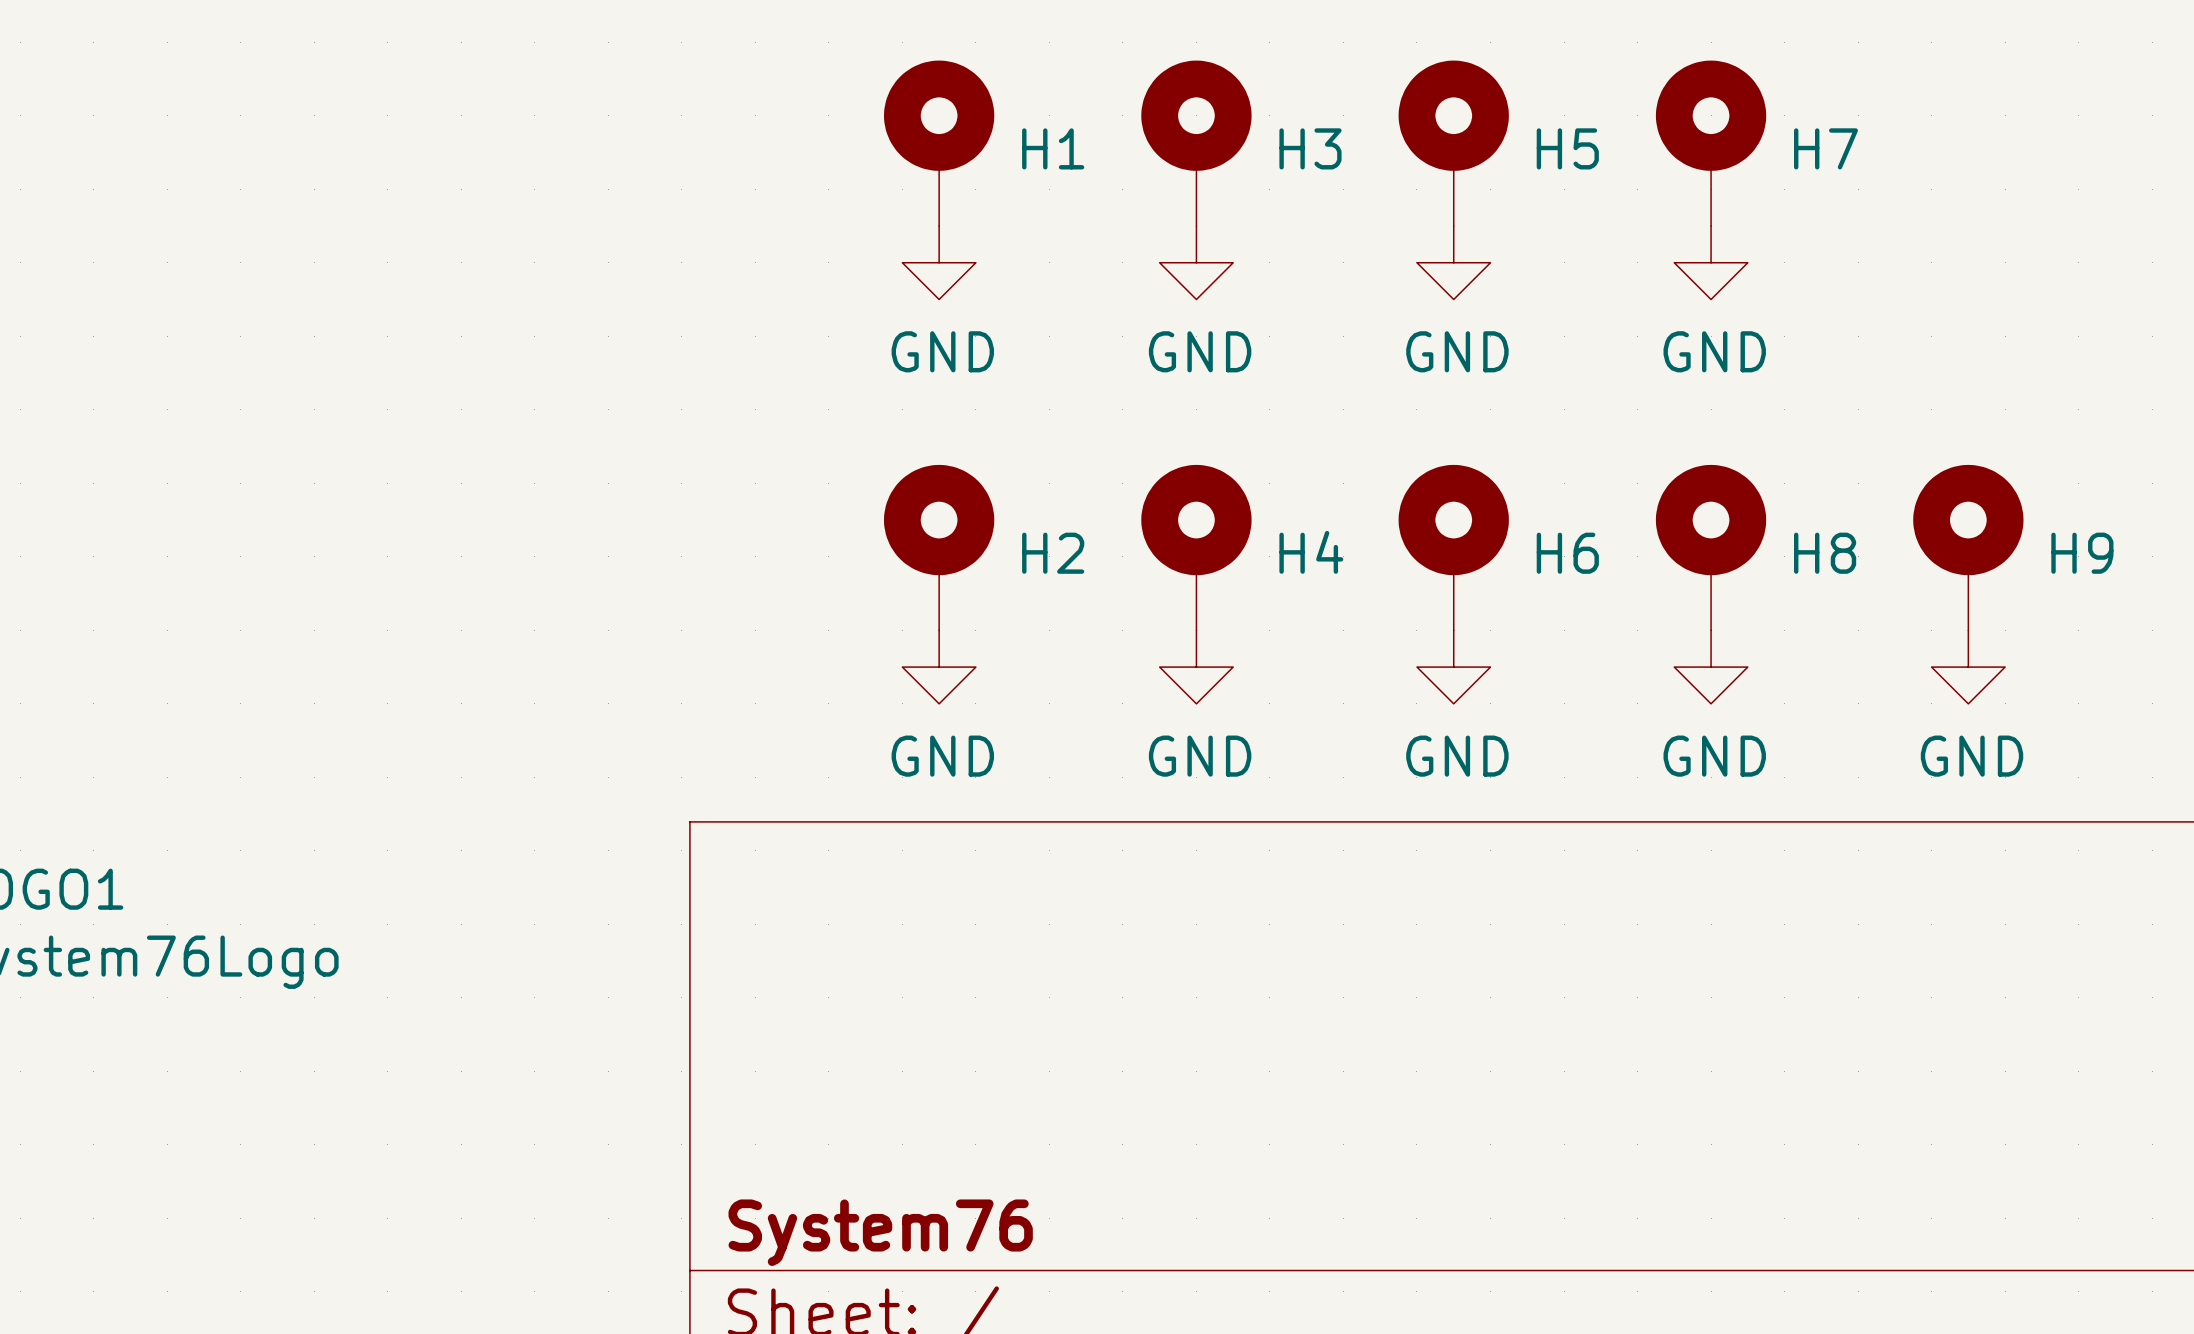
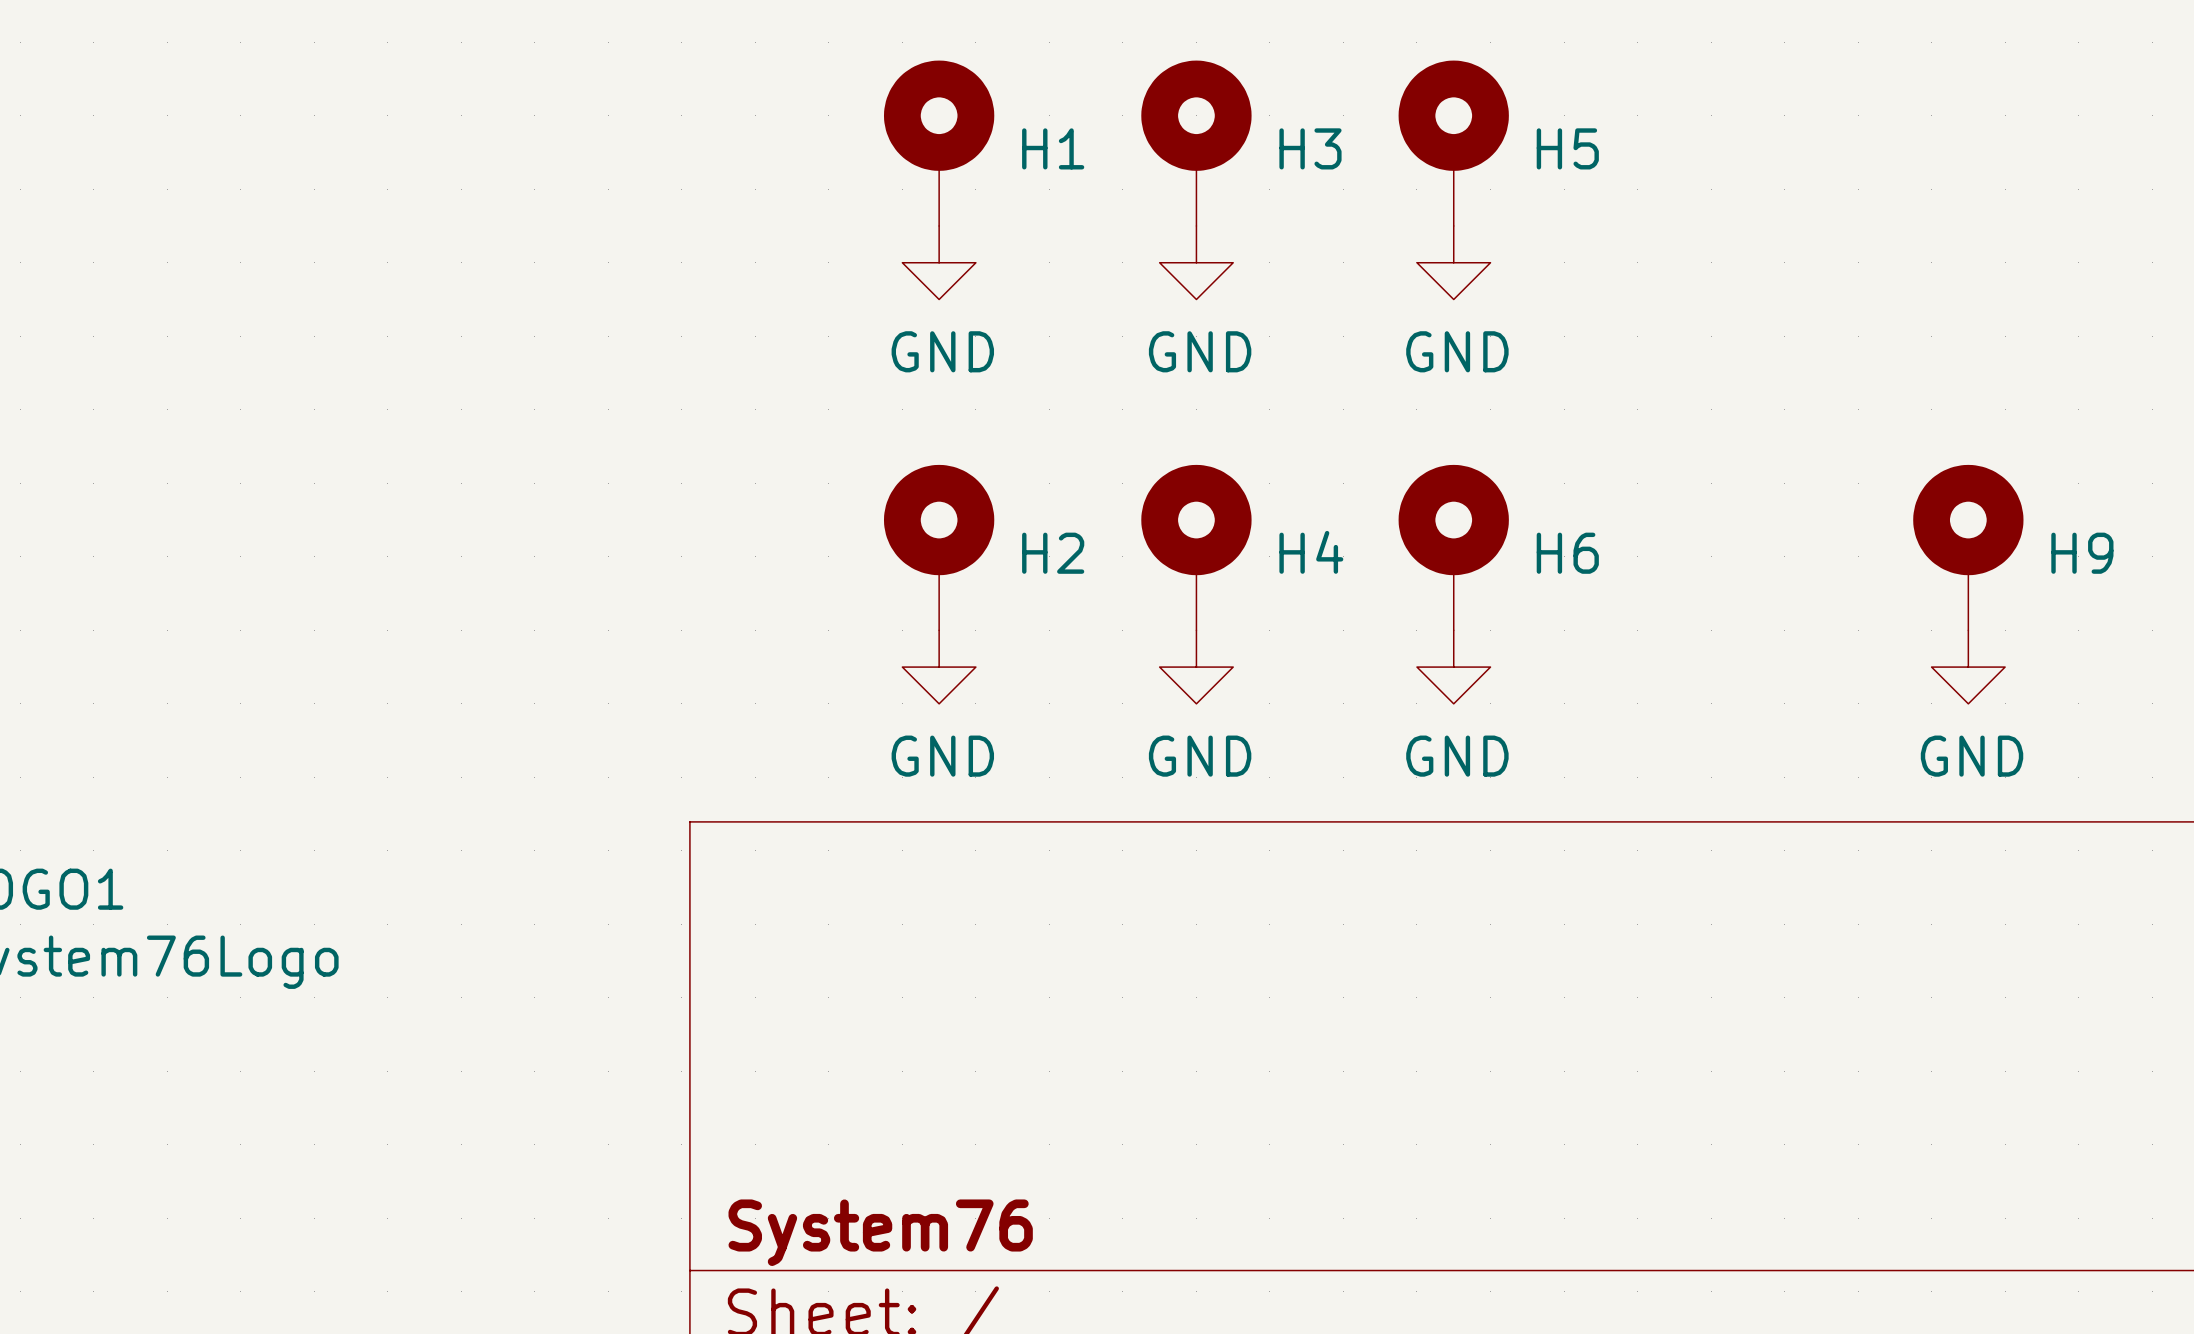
H7: (1711, 143) -> none
power symbol: GND (1711, 262) -> none
H8: (1711, 547) -> none
power symbol: GND (1711, 667) -> none

